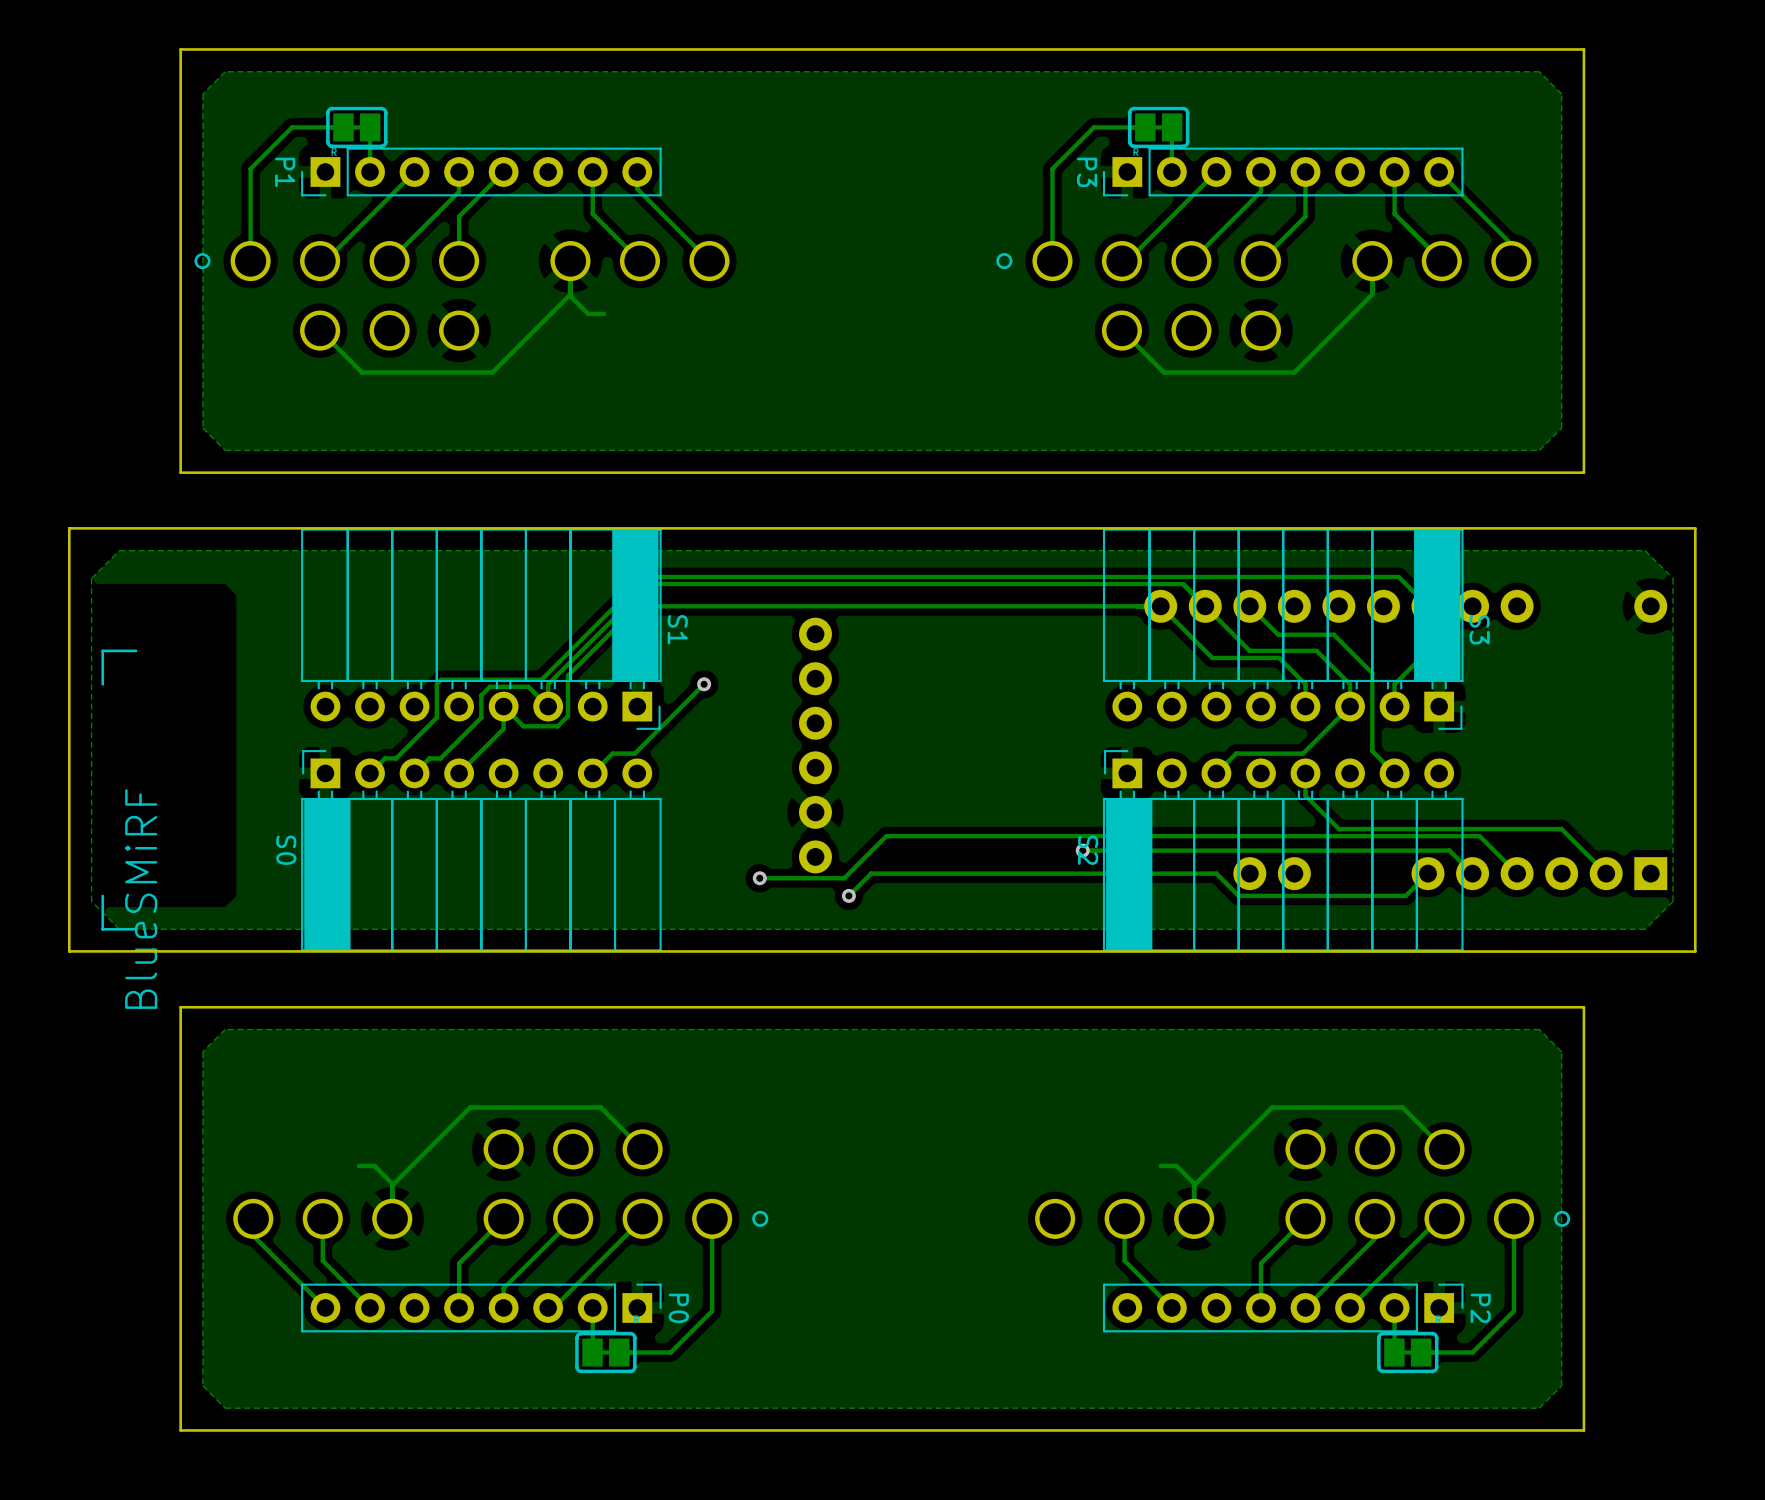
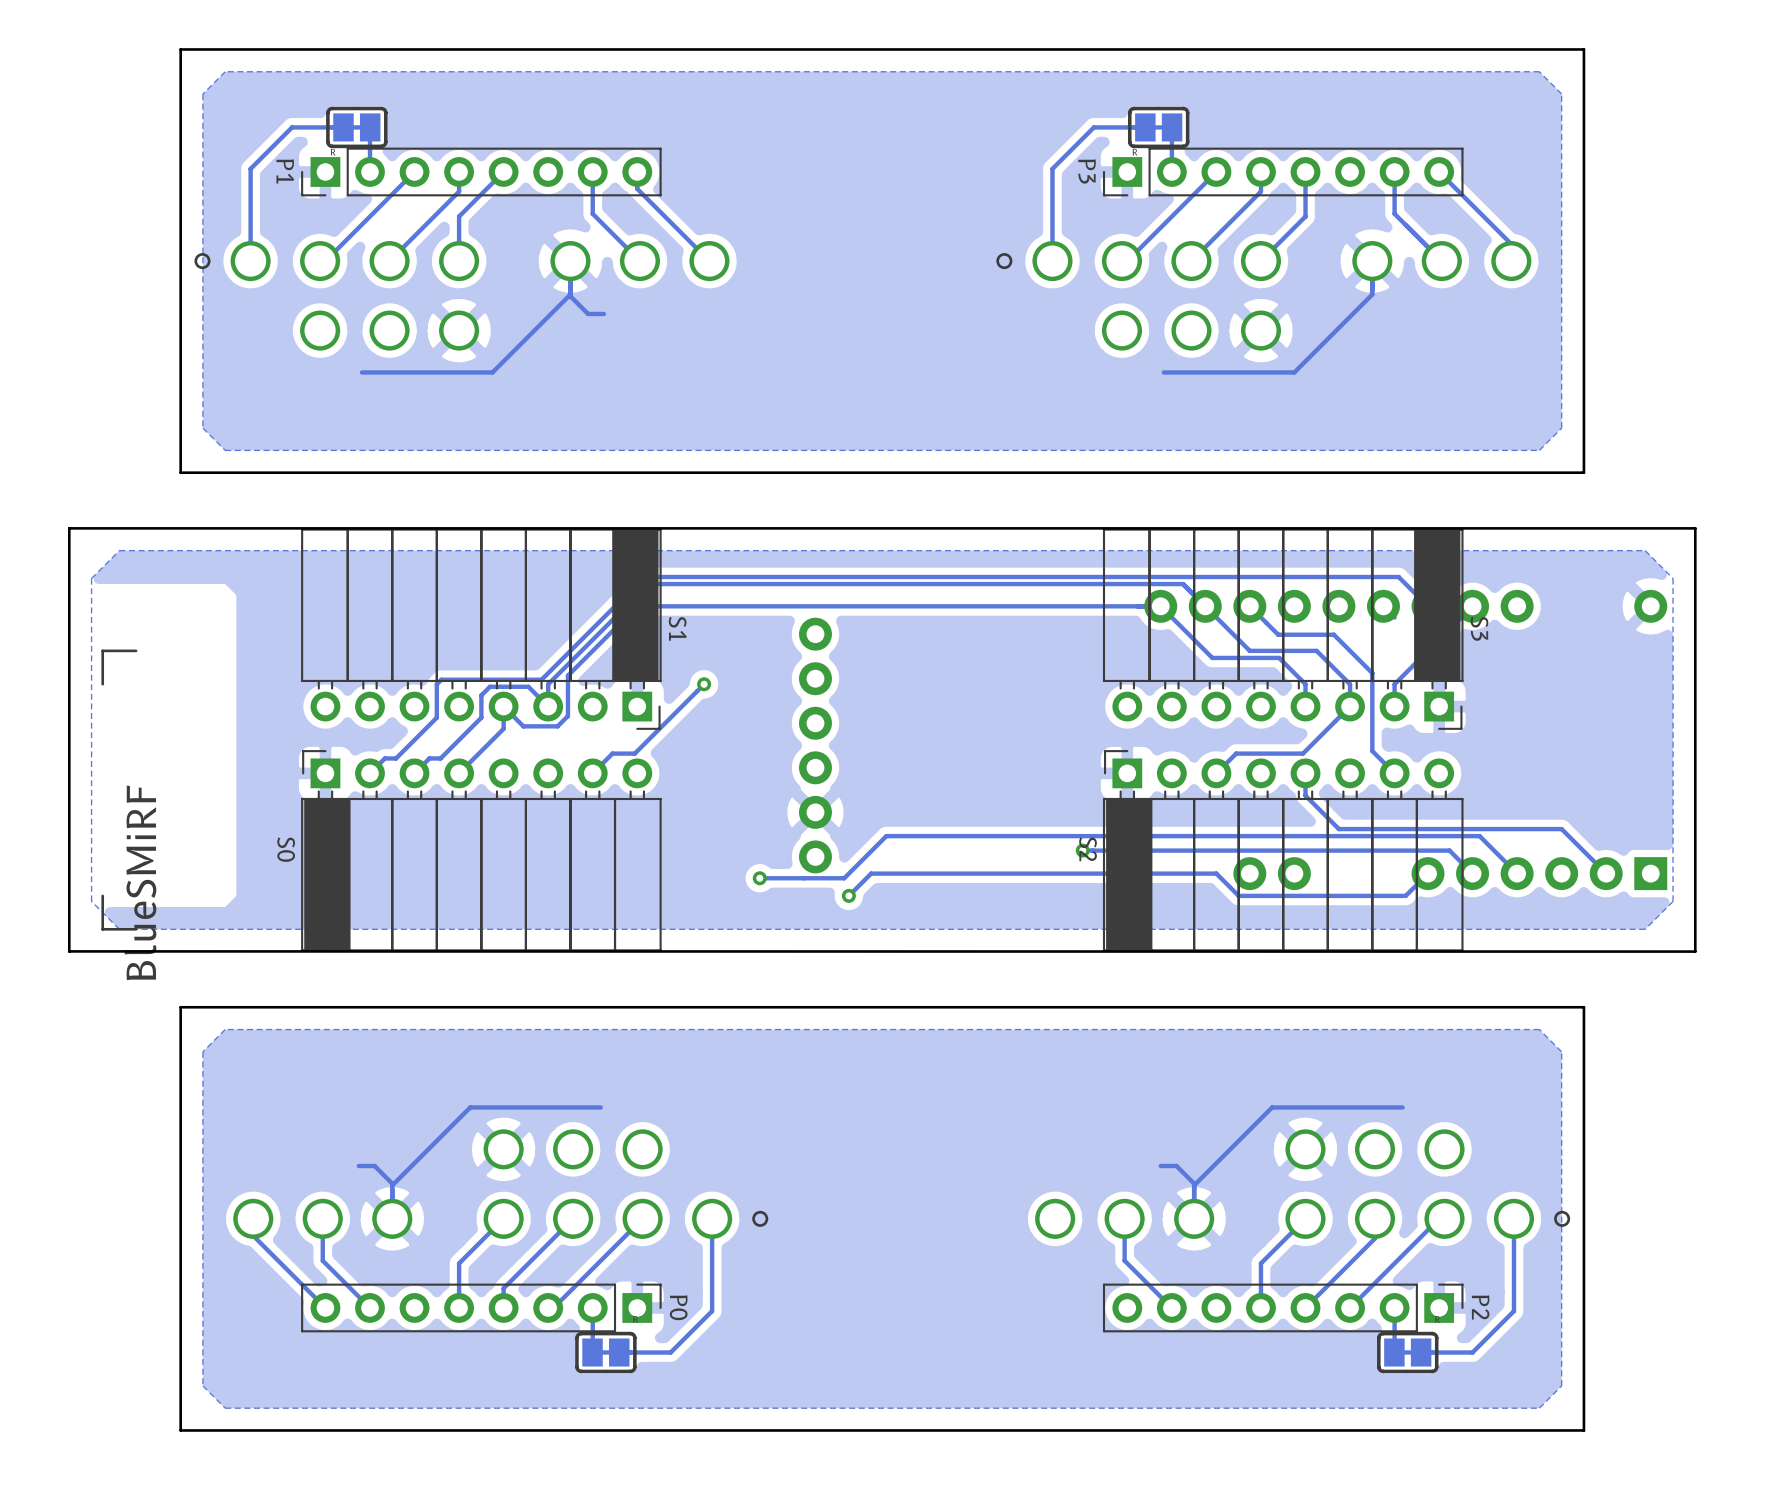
track: (320, 330) (361, 372) -> none
track: (1121, 330) (1163, 372) -> none
track: (600, 1107) (642, 1149) -> none
track: (1402, 1107) (1444, 1149) -> none

